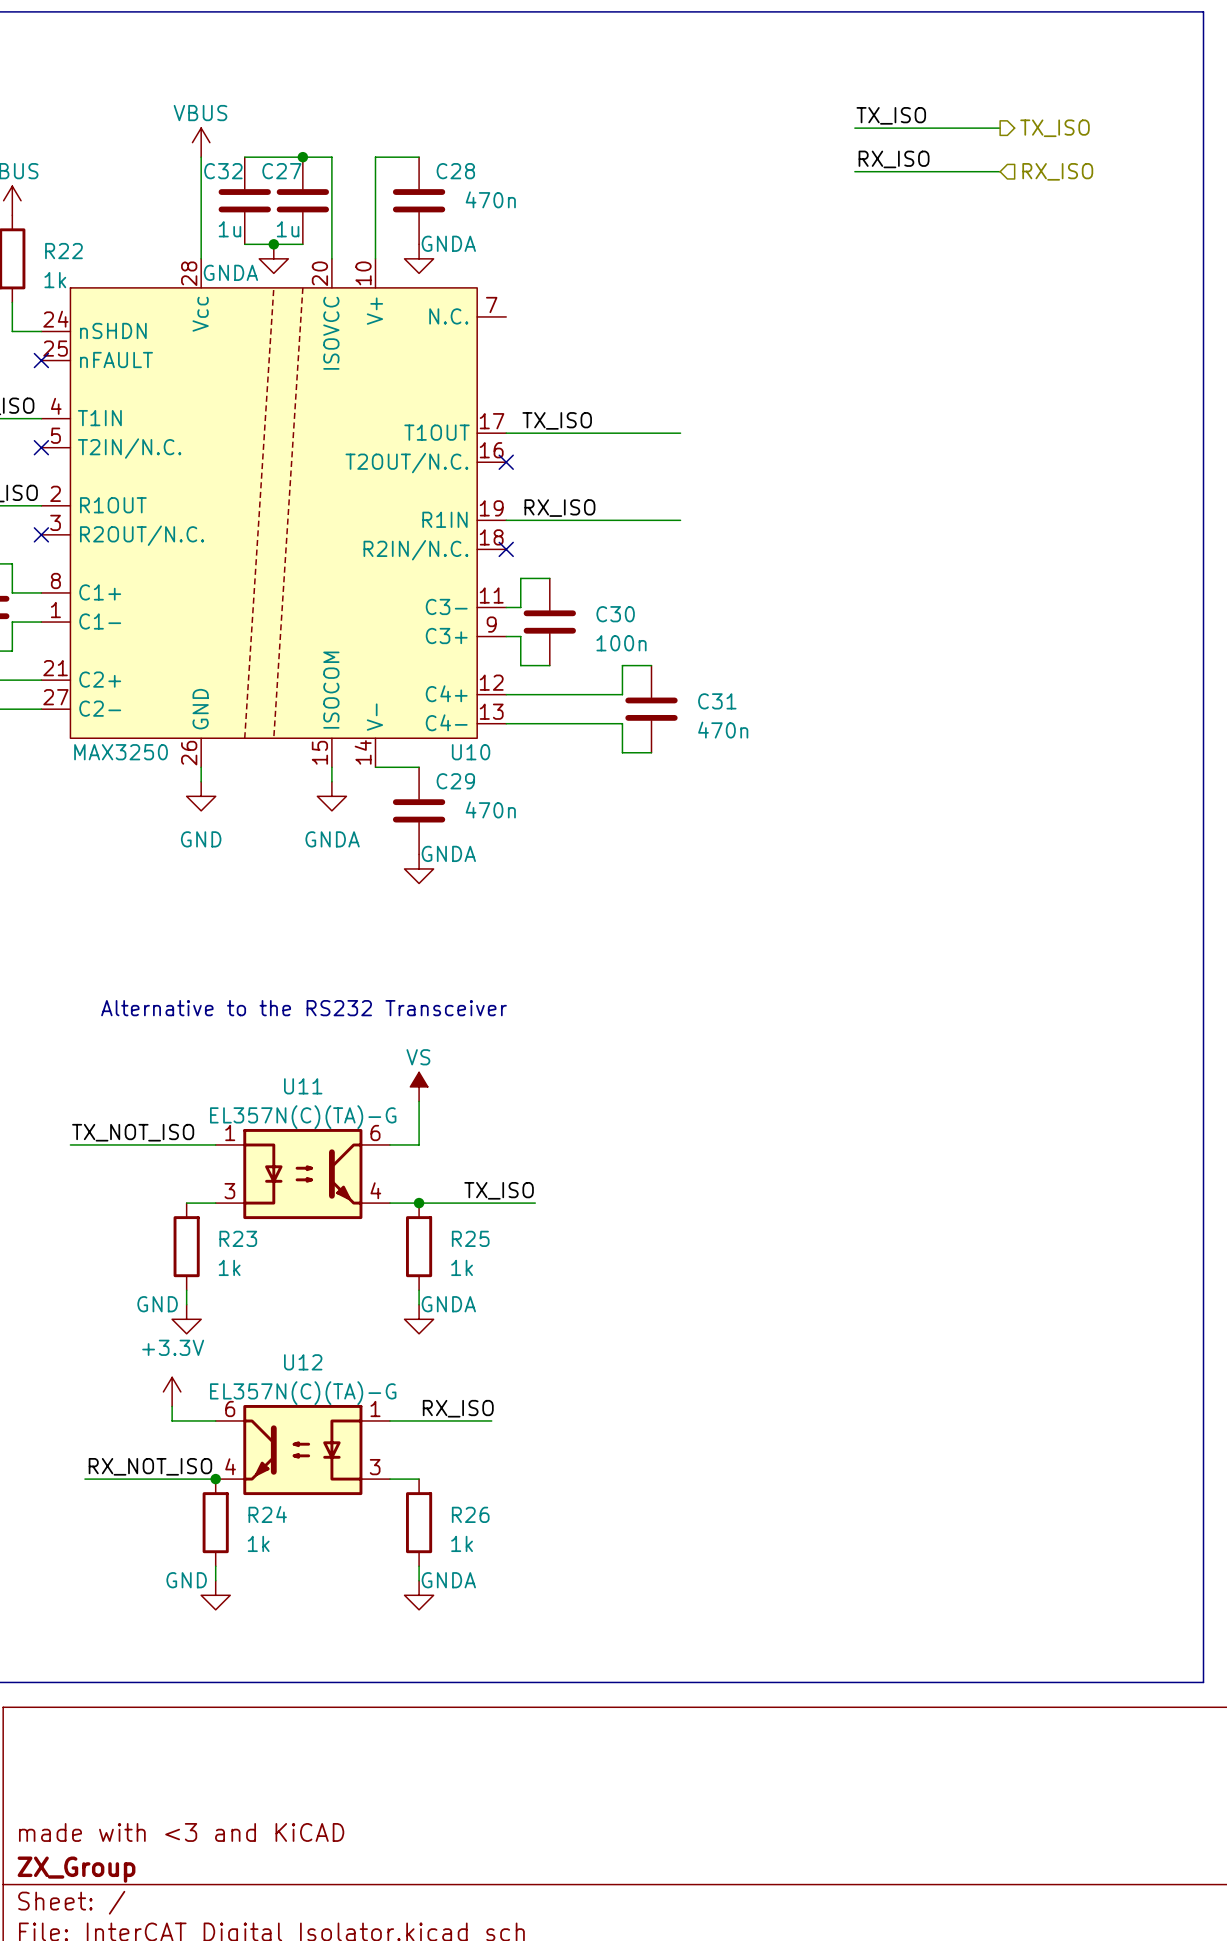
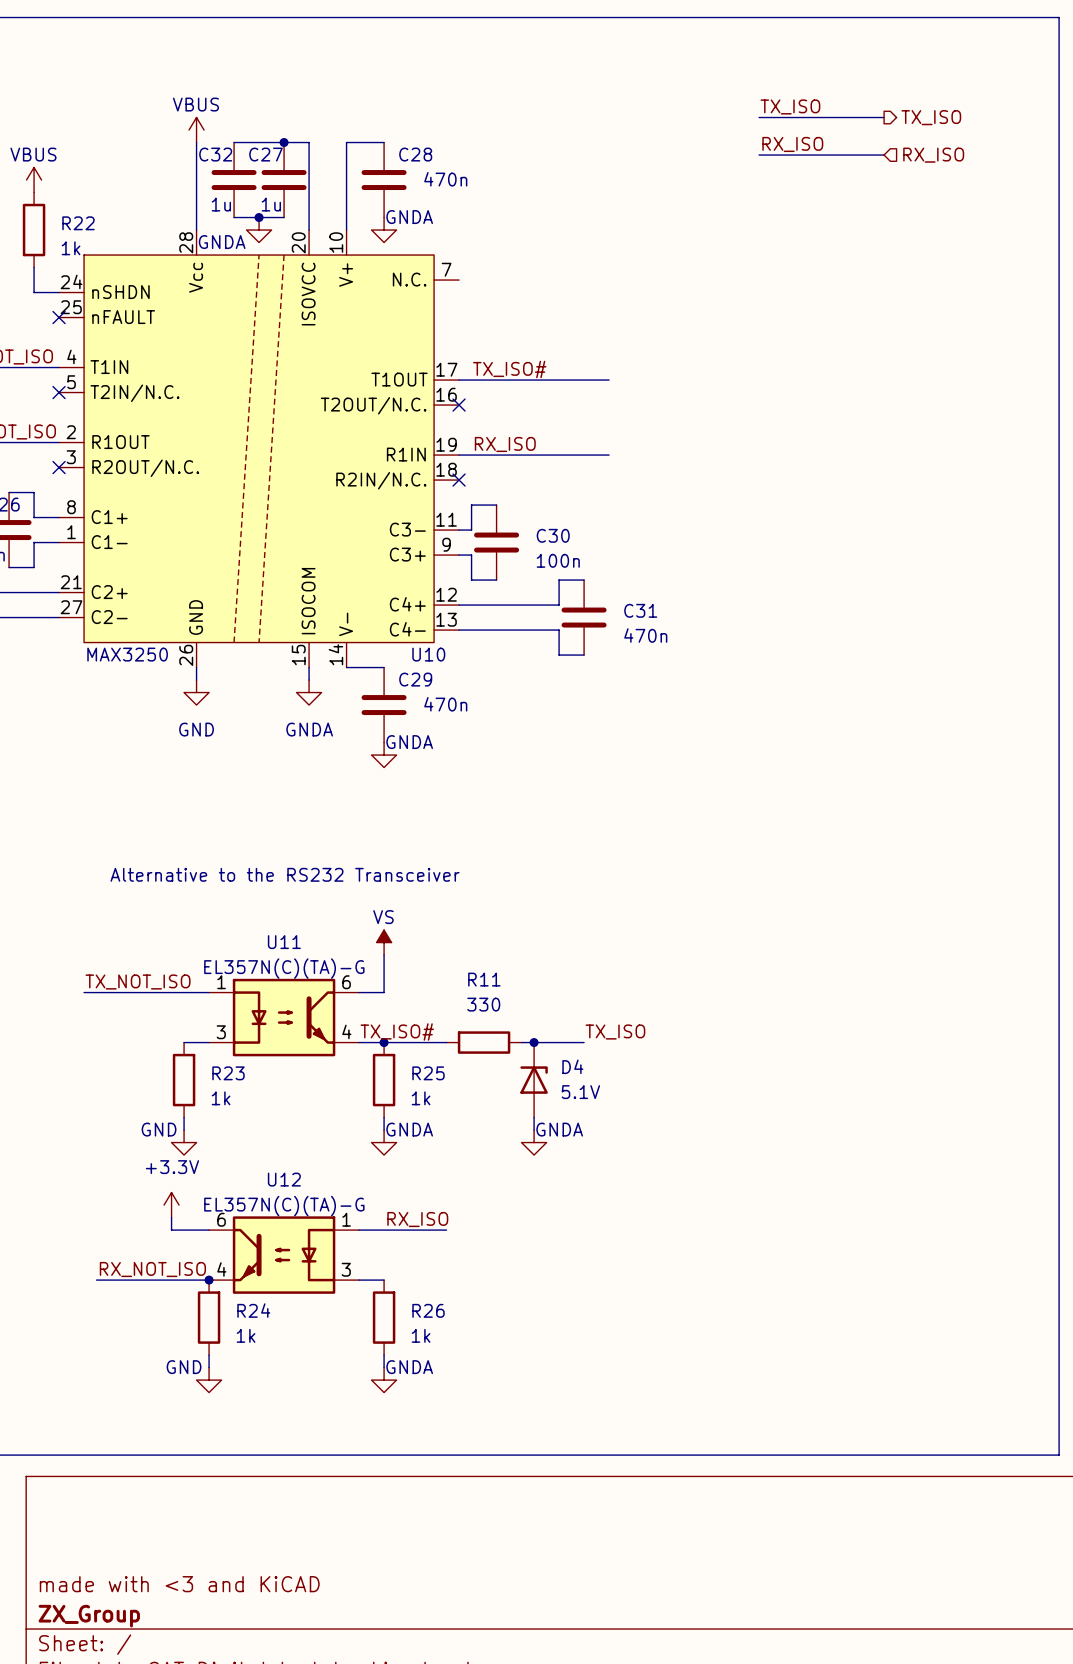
label: TX_ISO (557, 420) -> TX_ISO# (509, 369)
label: none -> TX_ISO# (397, 1032)
label position: TX_ISO (499, 1190) -> TX_ISO (615, 1032)
wire: (491, 1203) (535, 1203) -> none
R11: none -> 330 (484, 1042)
wire: none -> (521, 1042) (584, 1042)
junction: none -> (534, 1042)
D4: none -> 5.1V (534, 1080)
wire: none -> (534, 1117) (534, 1130)
power symbol: none -> GNDA (534, 1142)

